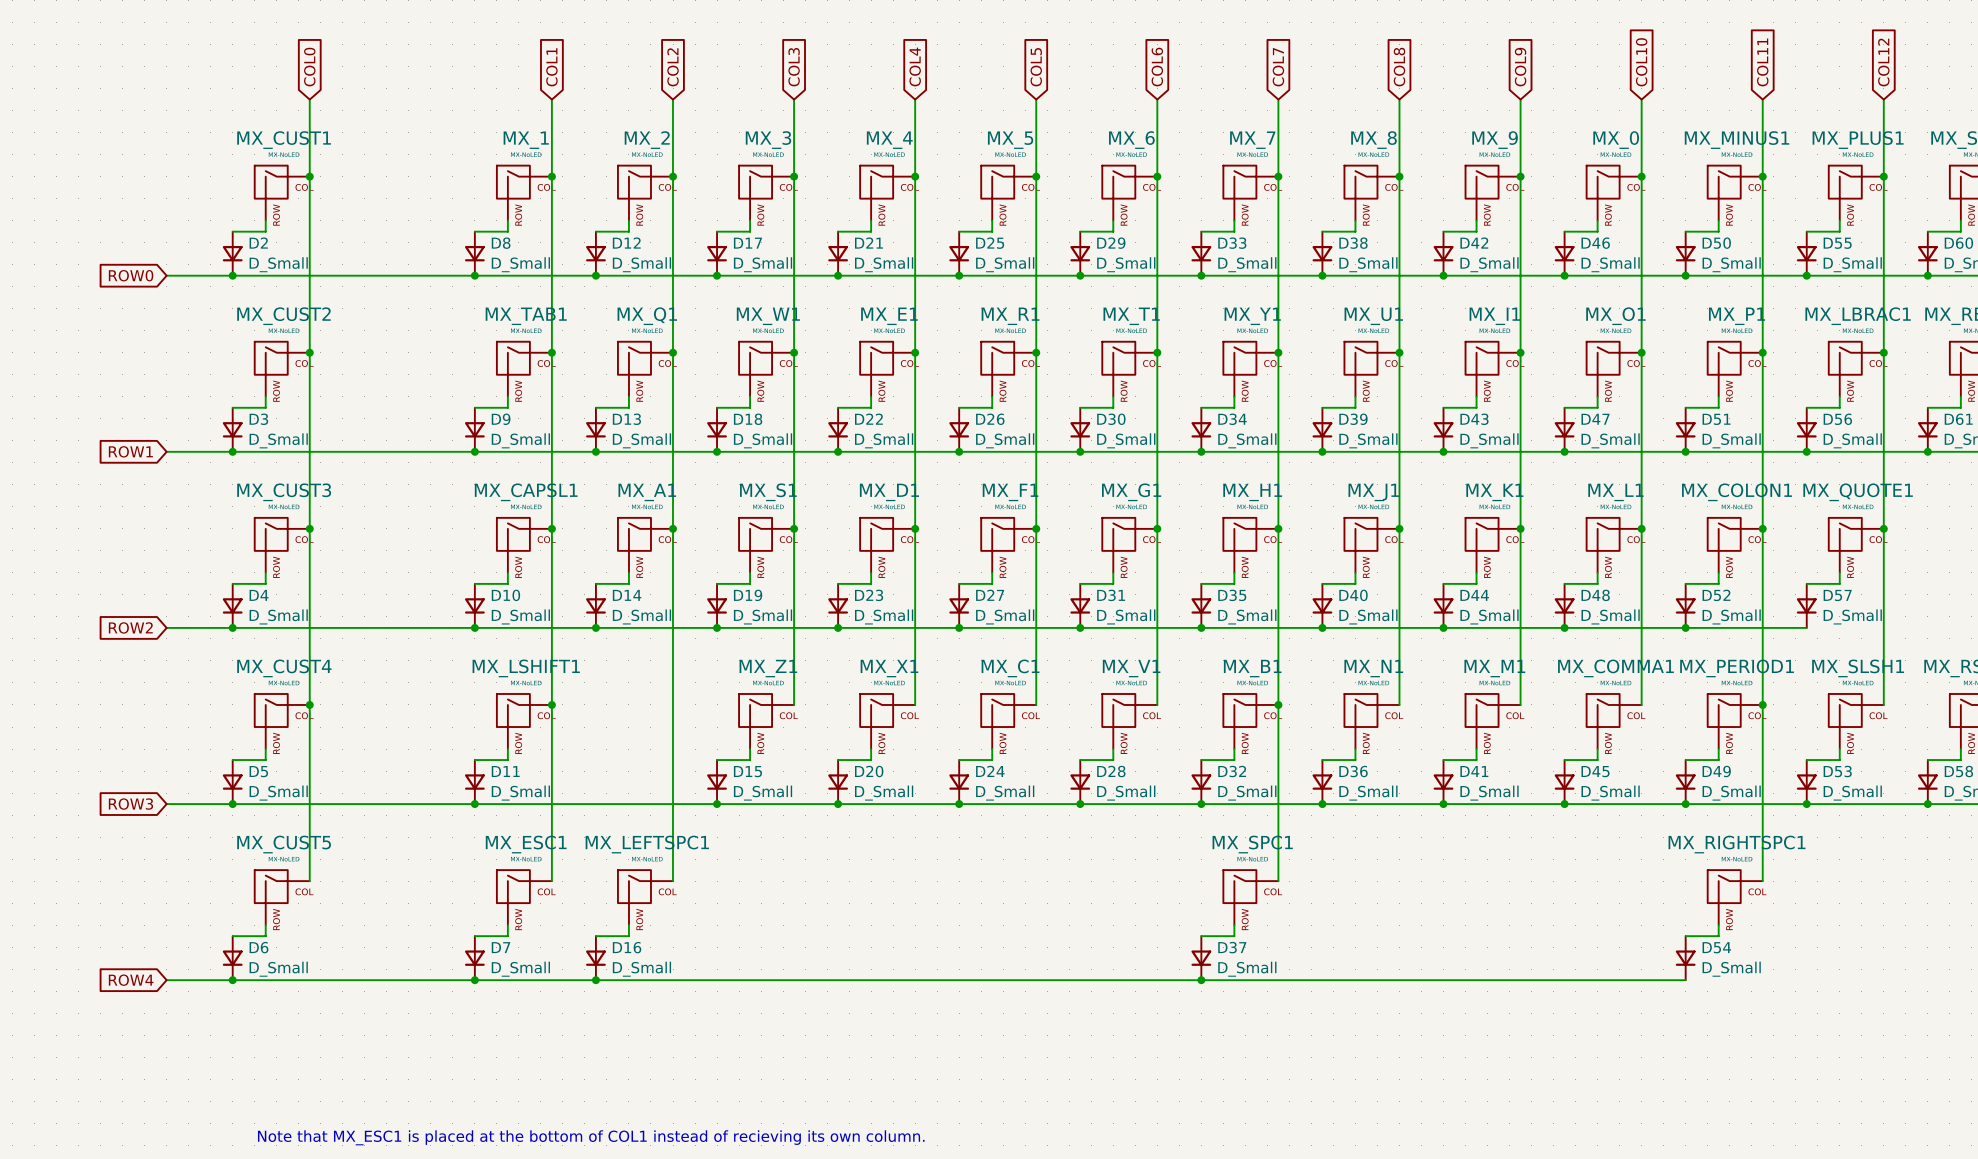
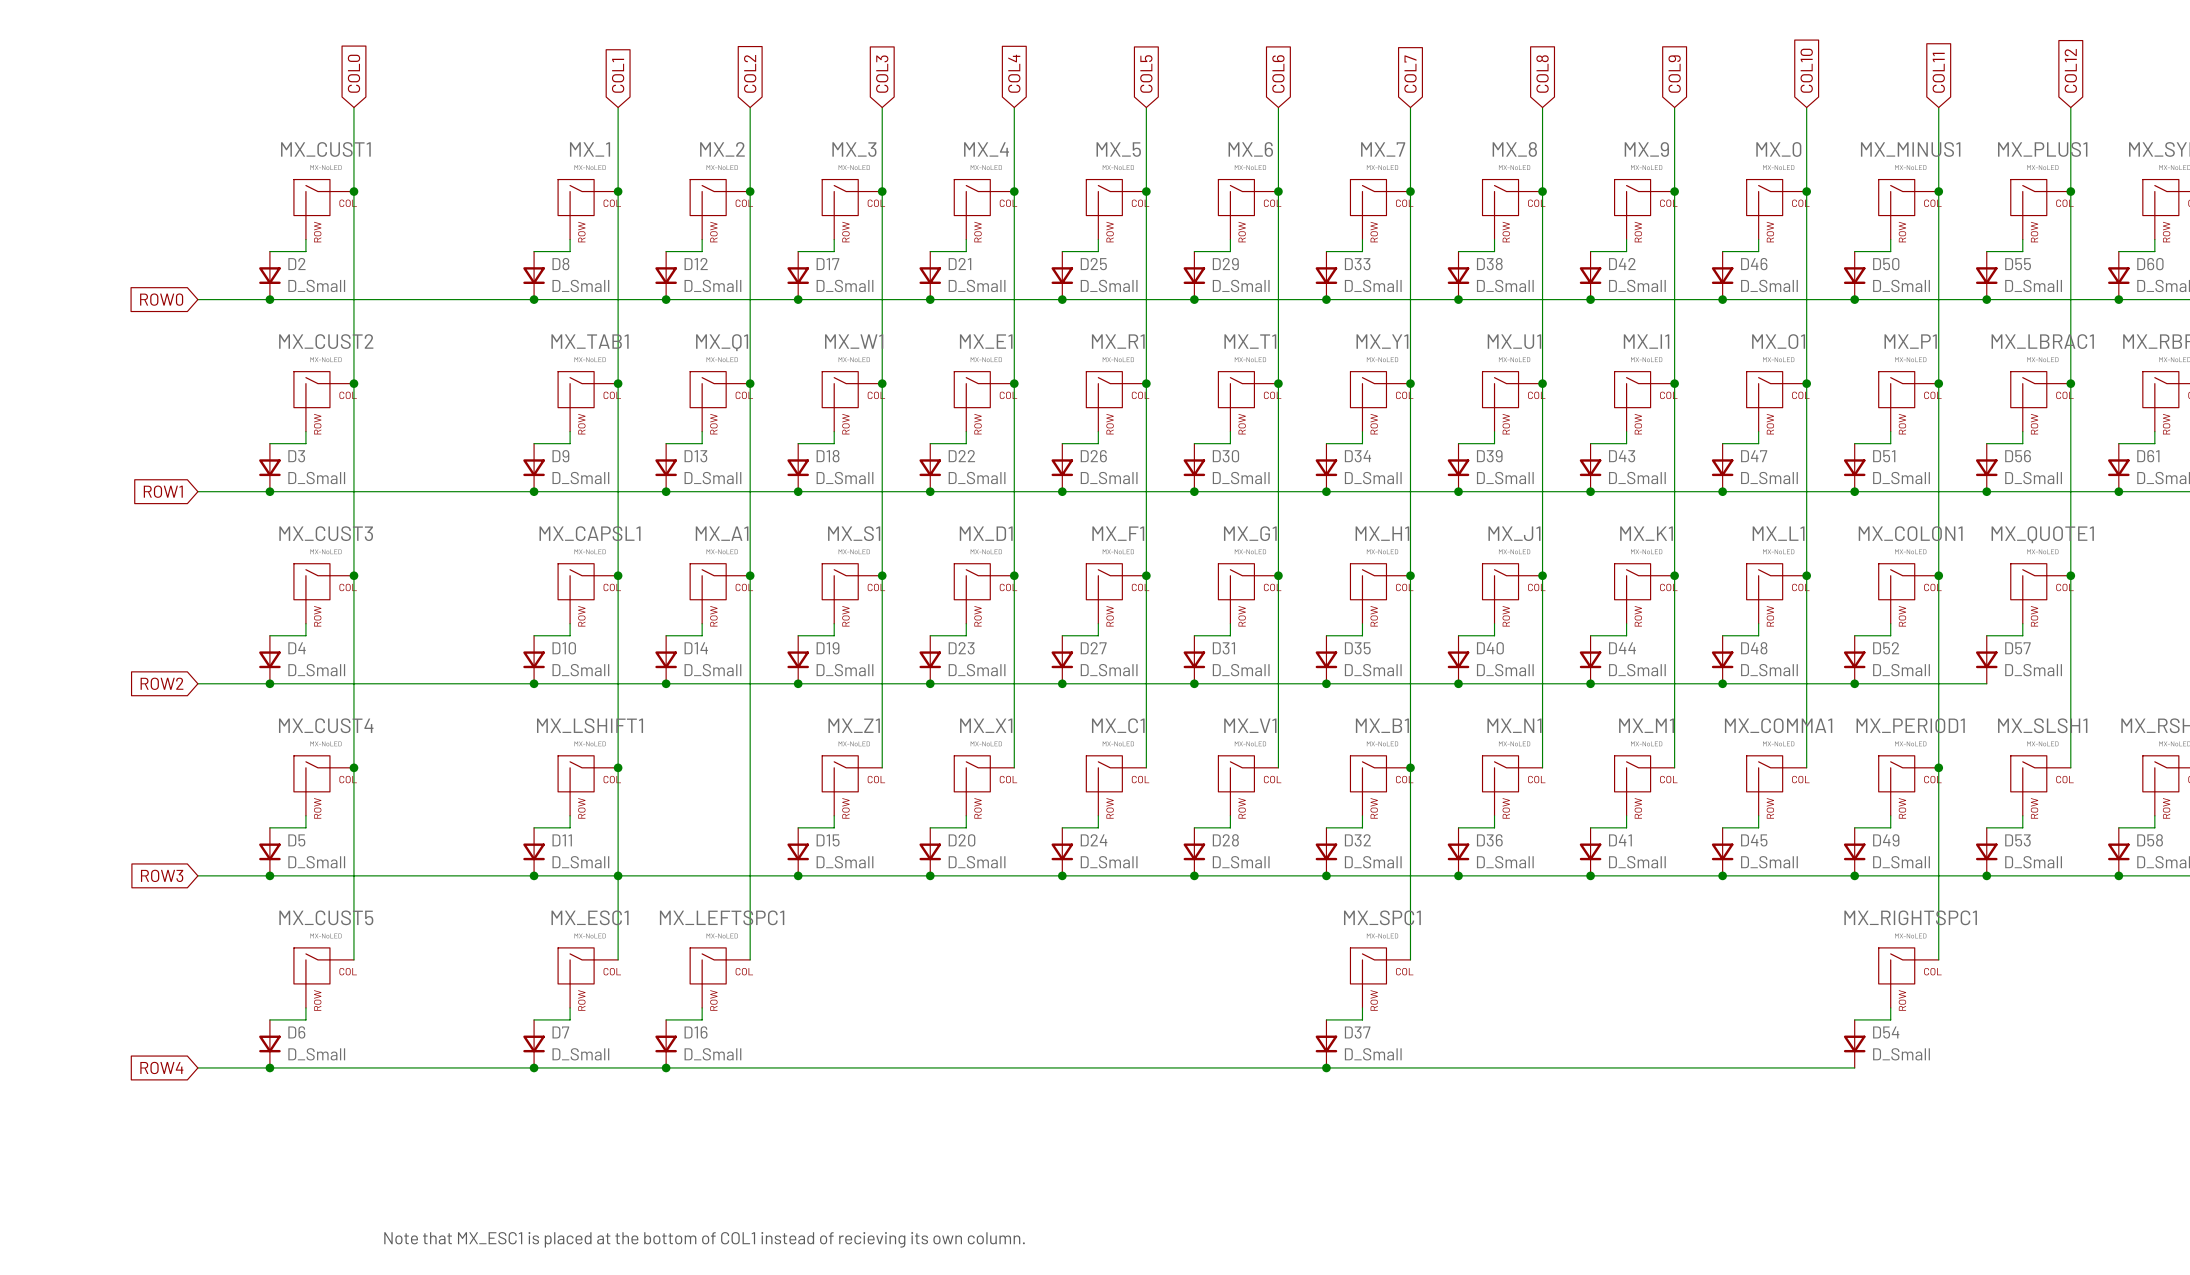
junction: none -> (618, 875)

